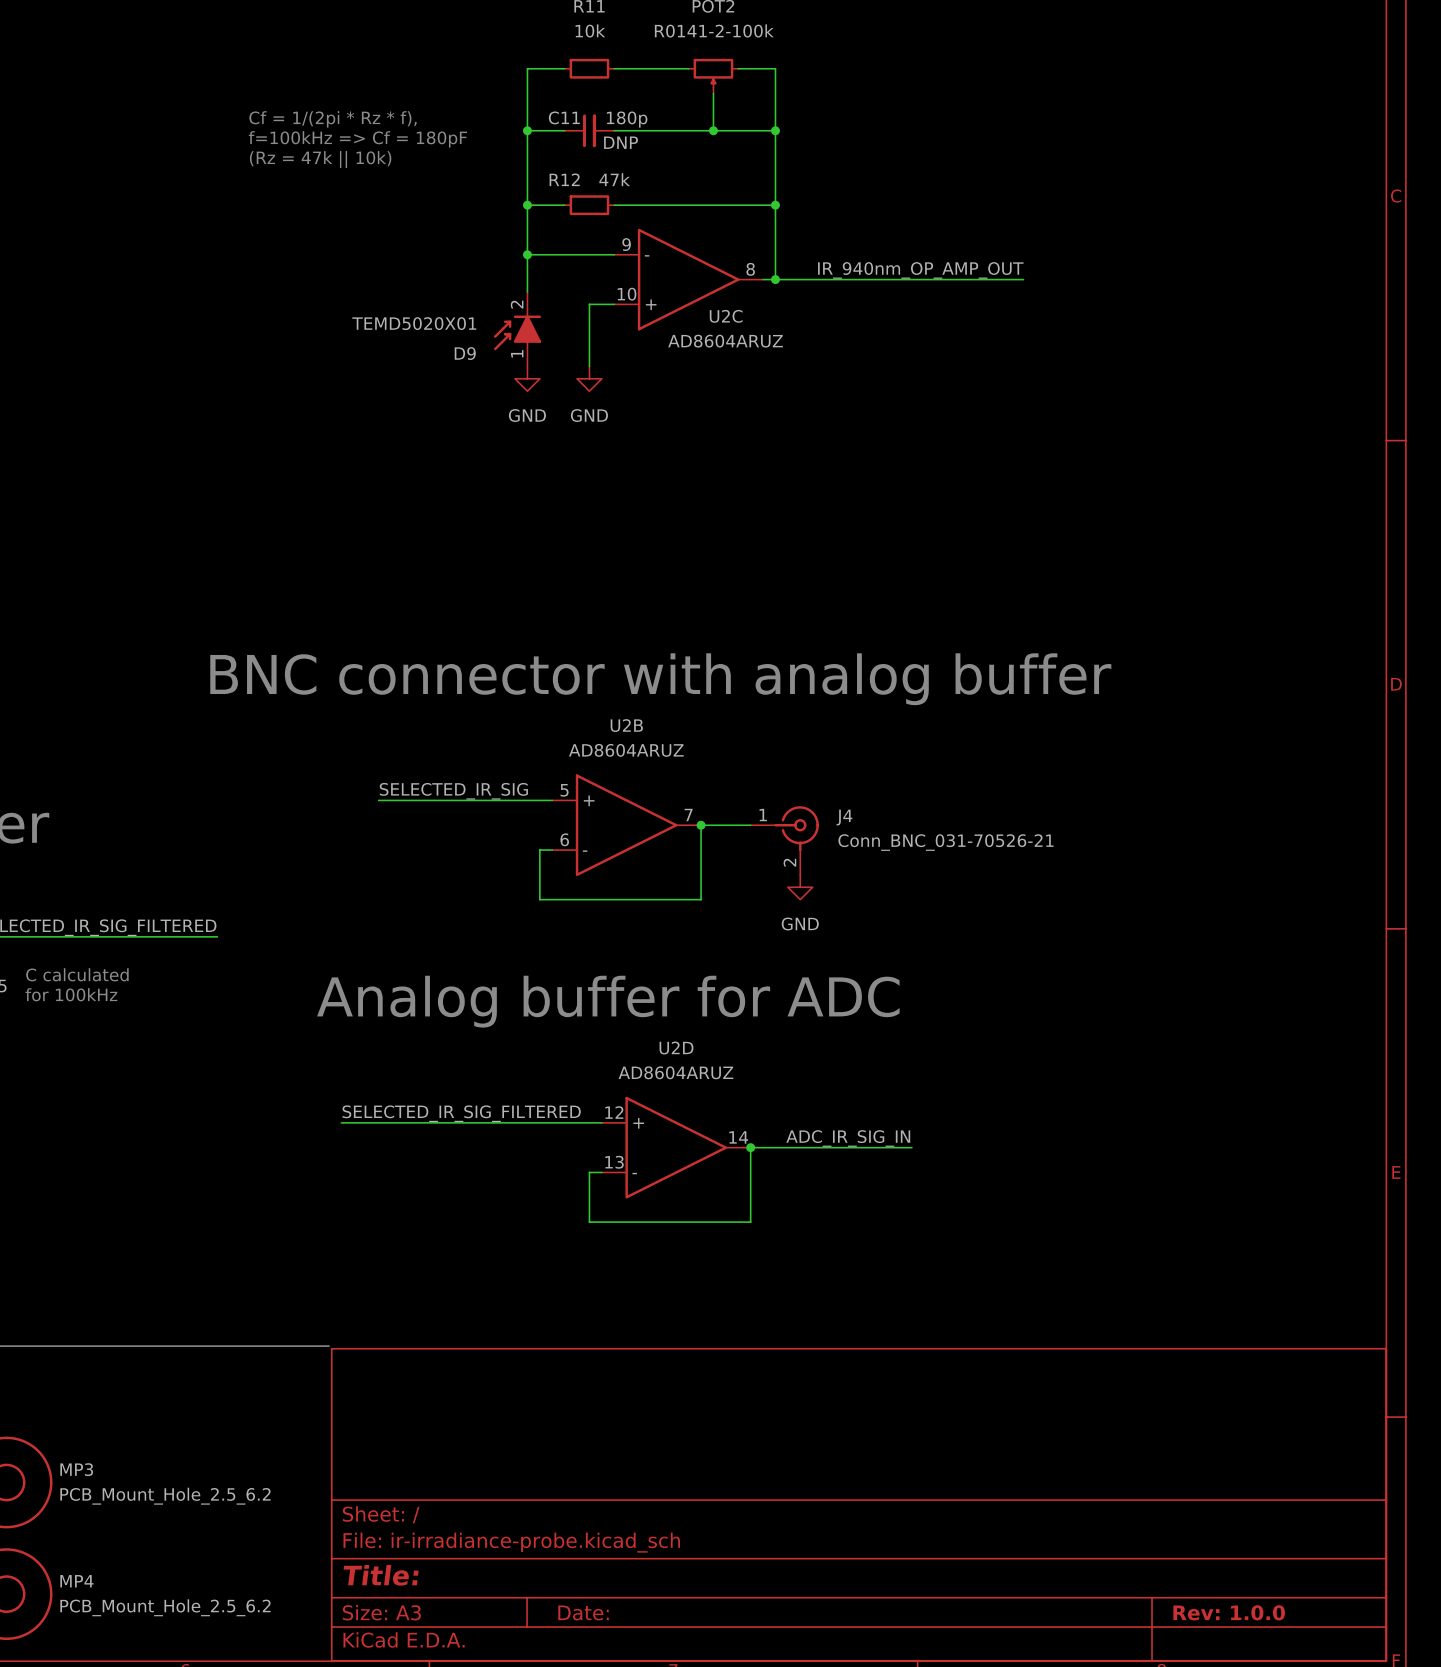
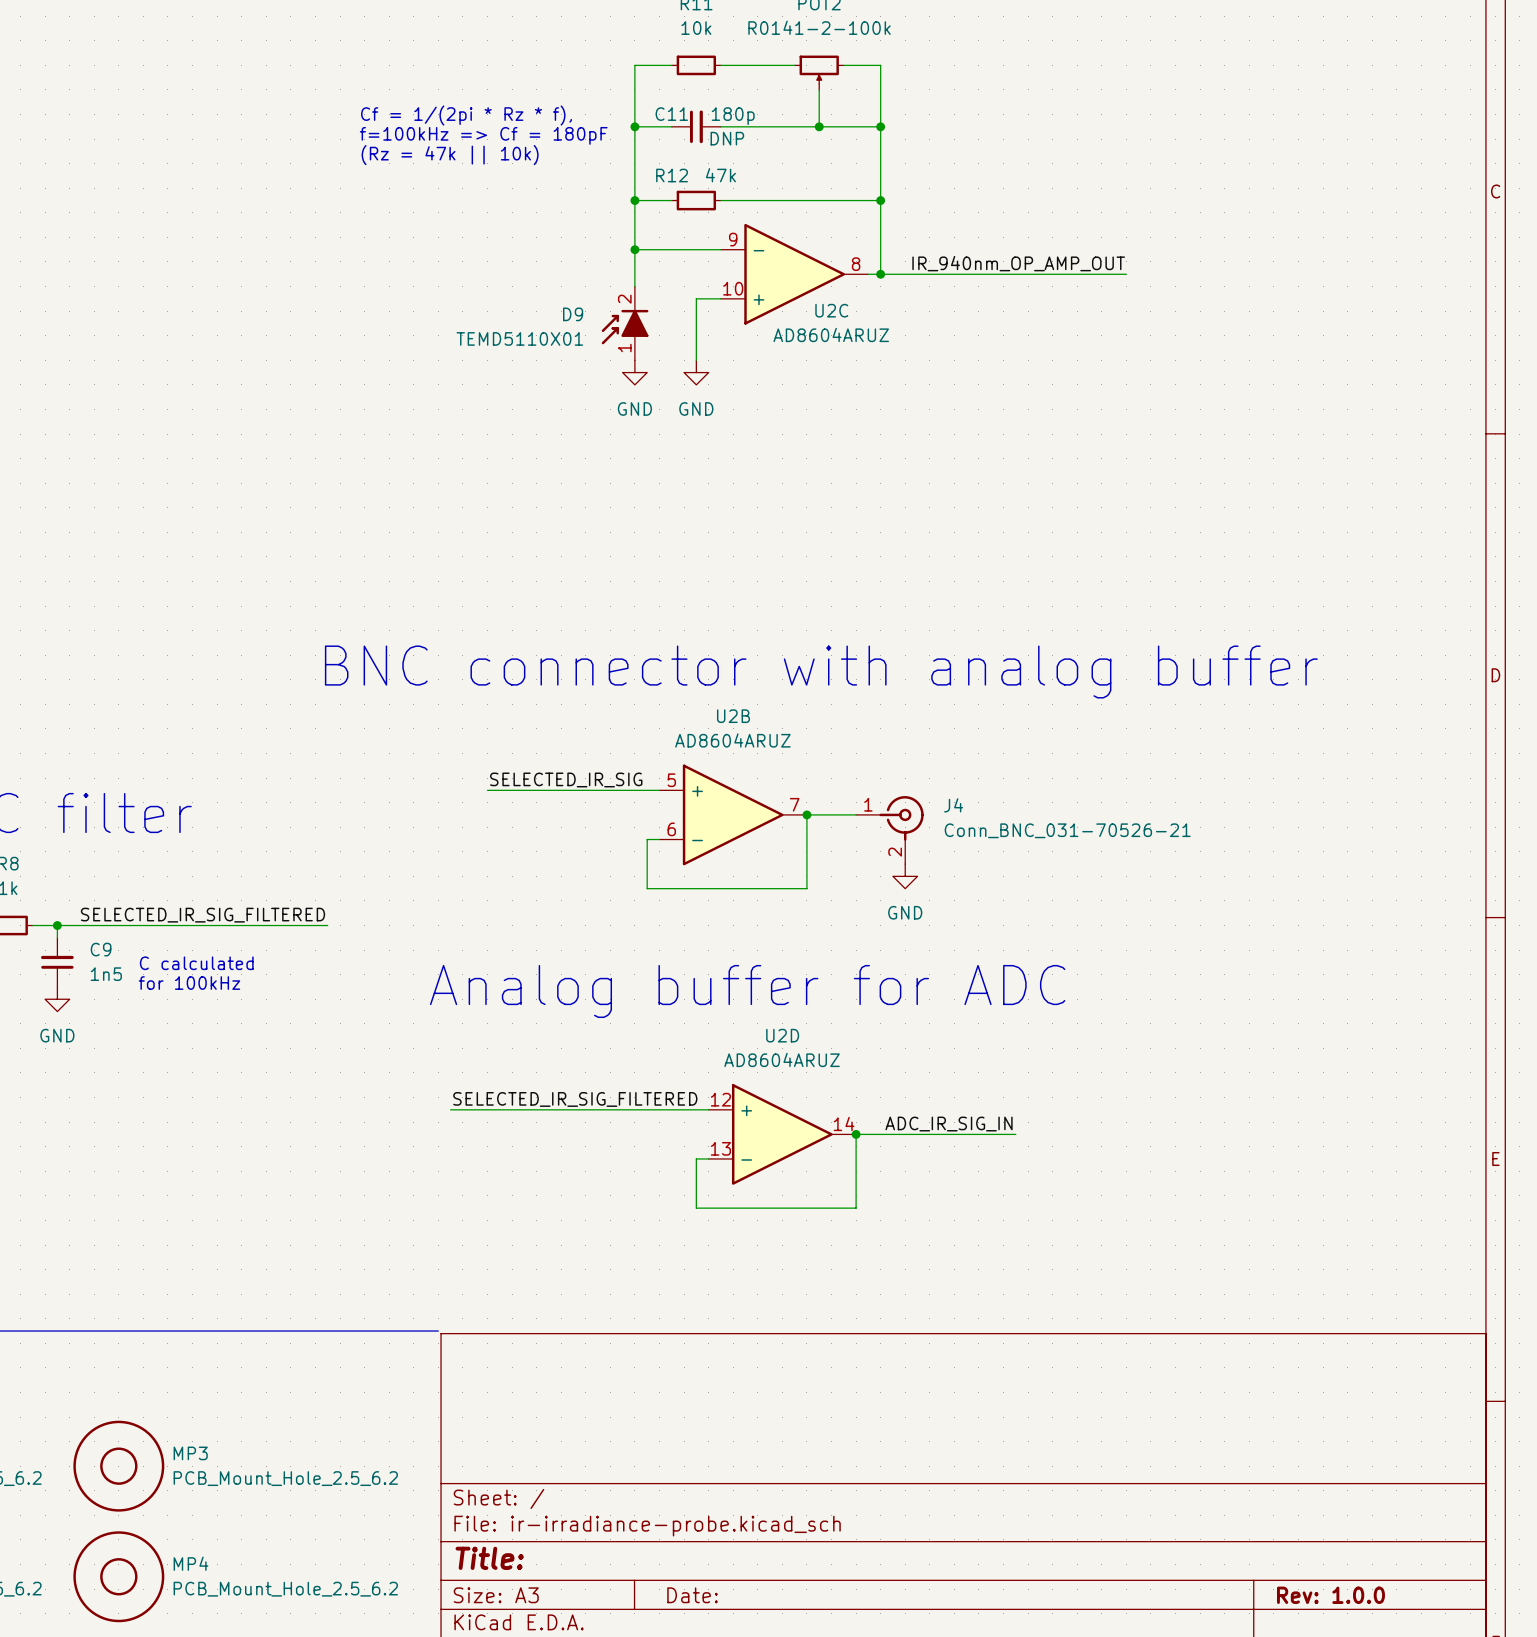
D9 value: TEMD5020X01 (414, 323) -> TEMD5110X01 (519, 338)
D9 name position: D9 (465, 353) -> D9 (573, 314)

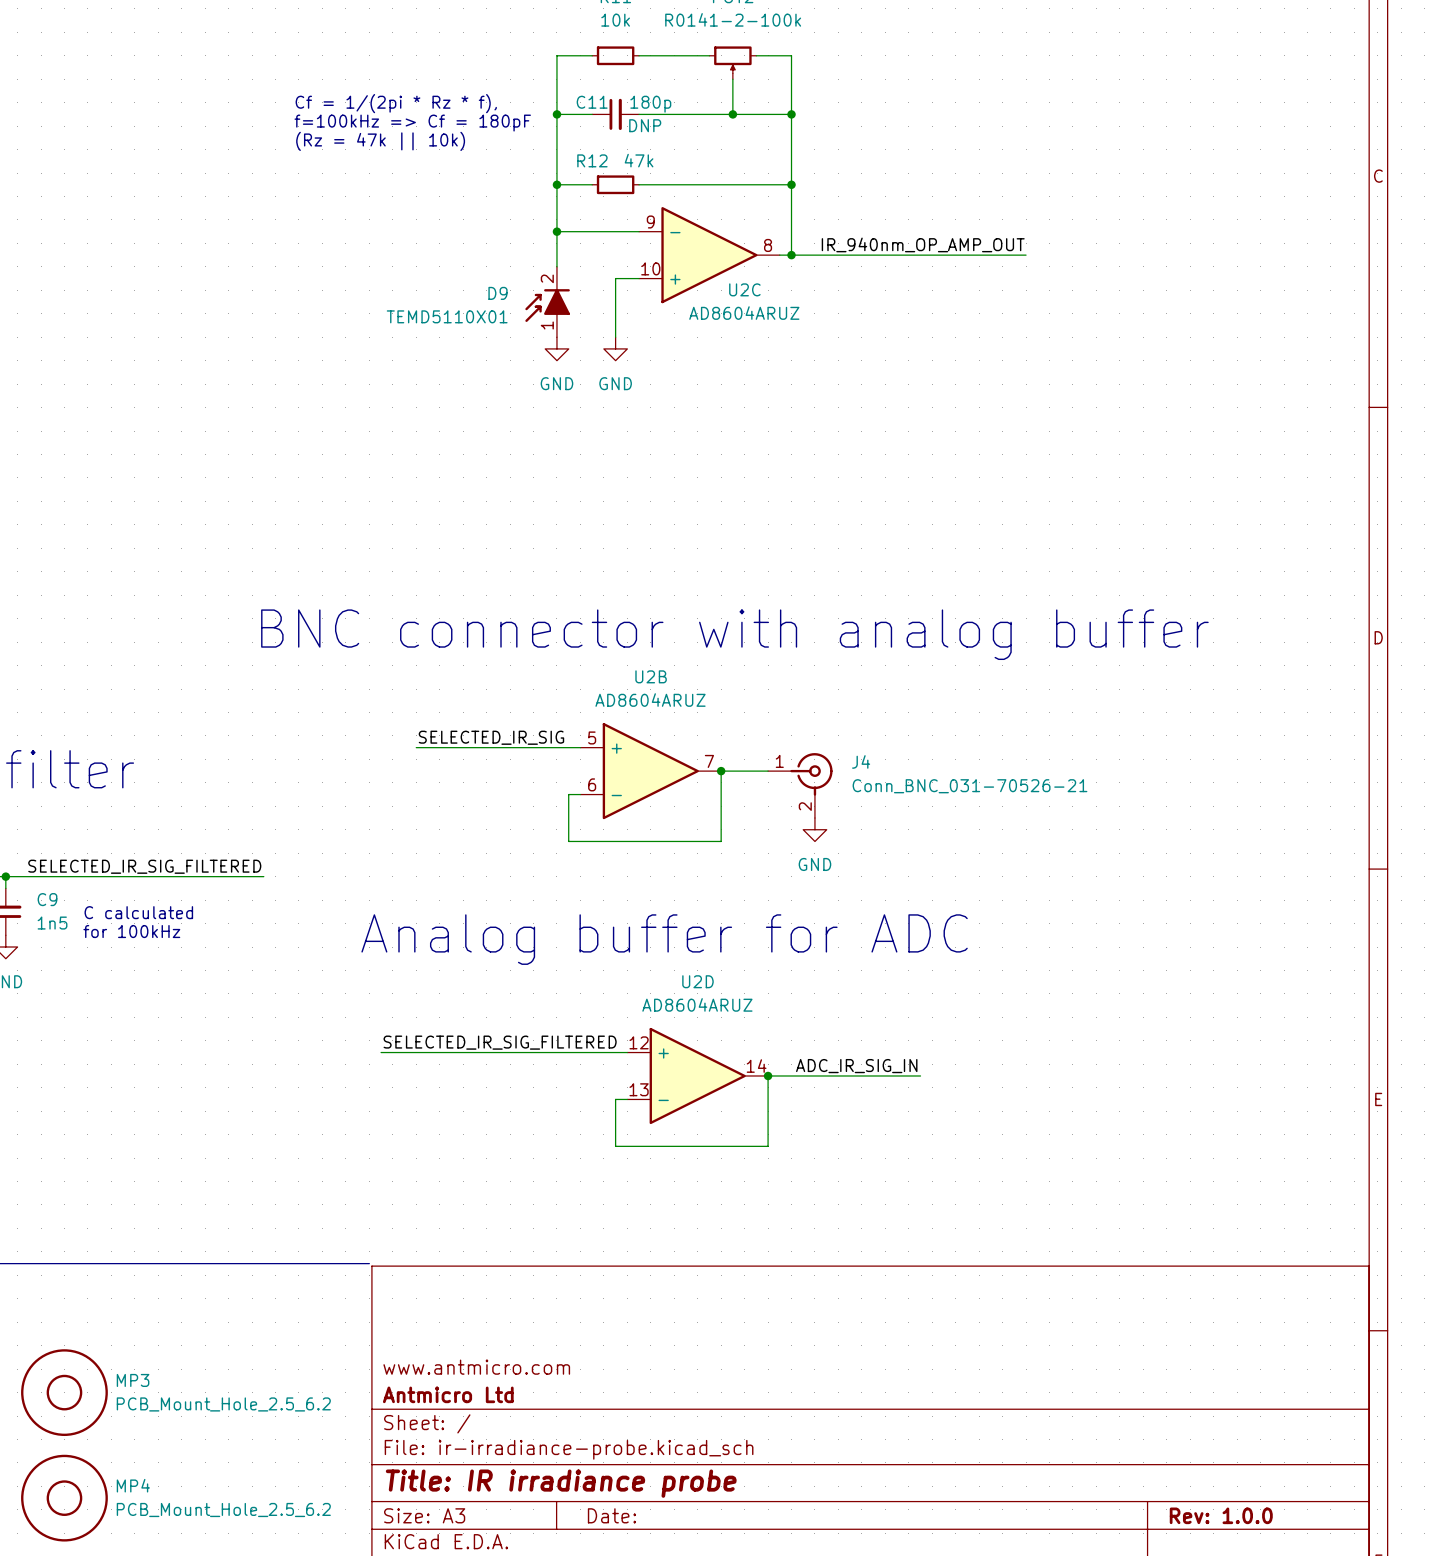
title block: none -> www.antmicro.com (476, 1367)
title block: none -> Antmicro Ltd (448, 1394)
title block: Title: (489, 1558) -> Title: IR irradiance probe (561, 1483)

